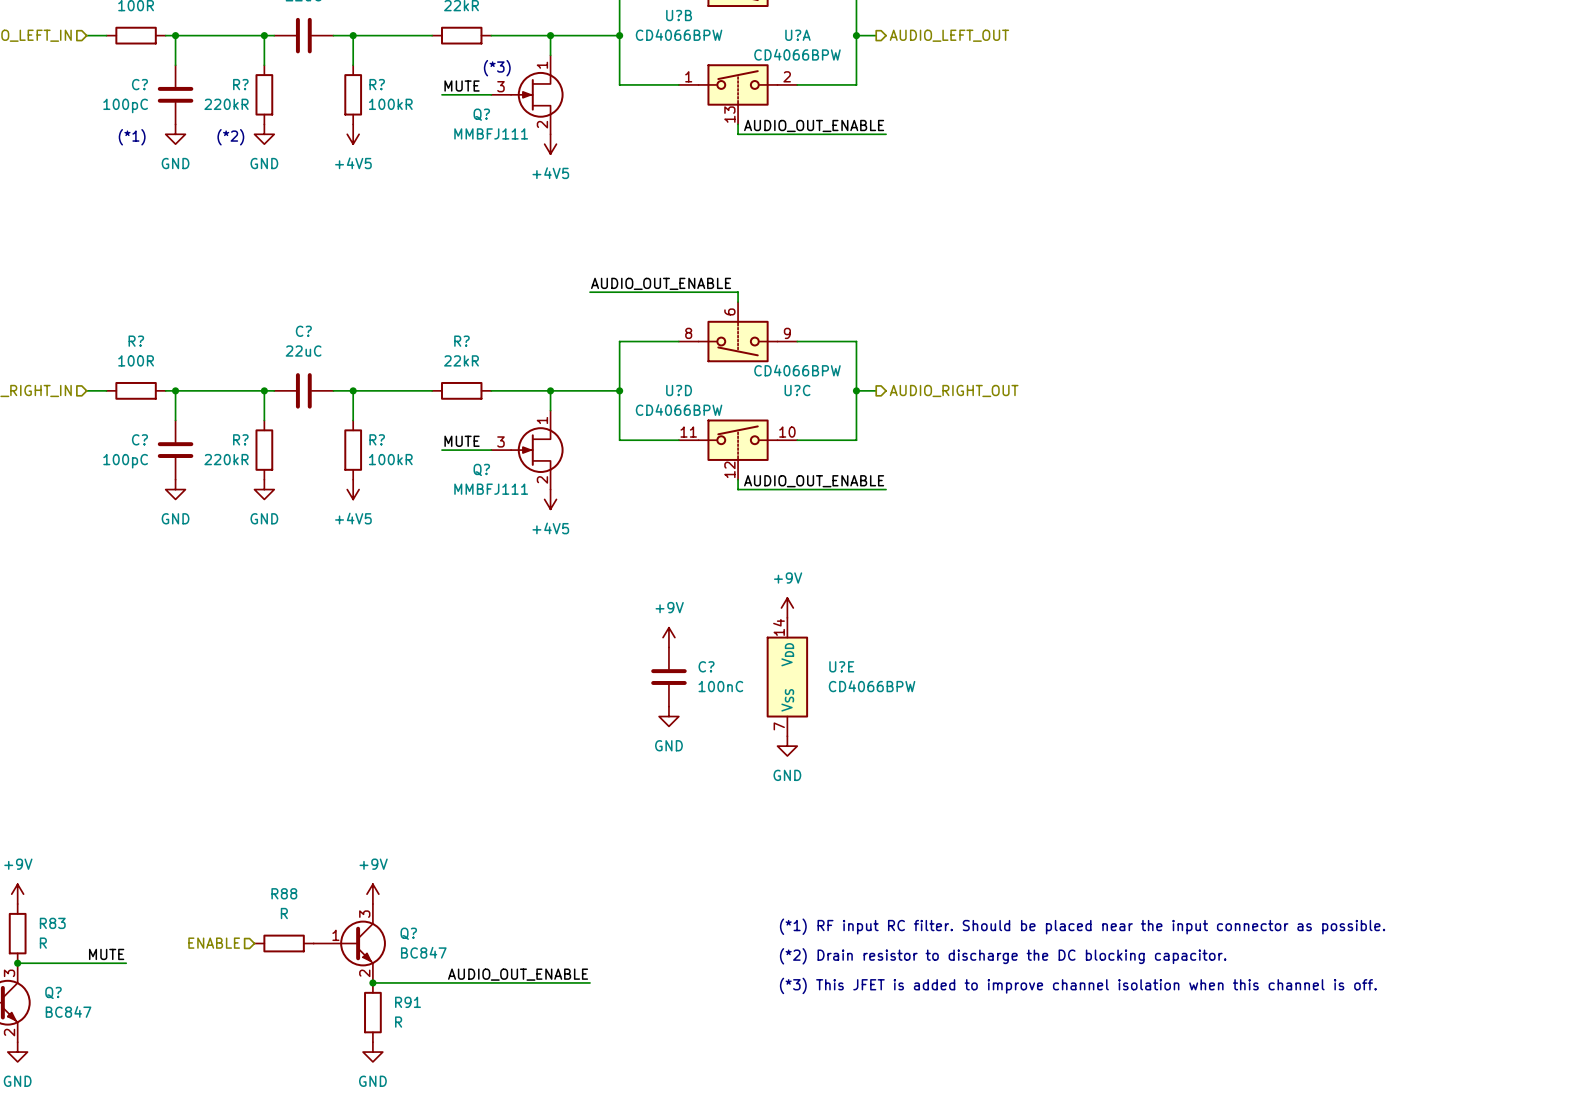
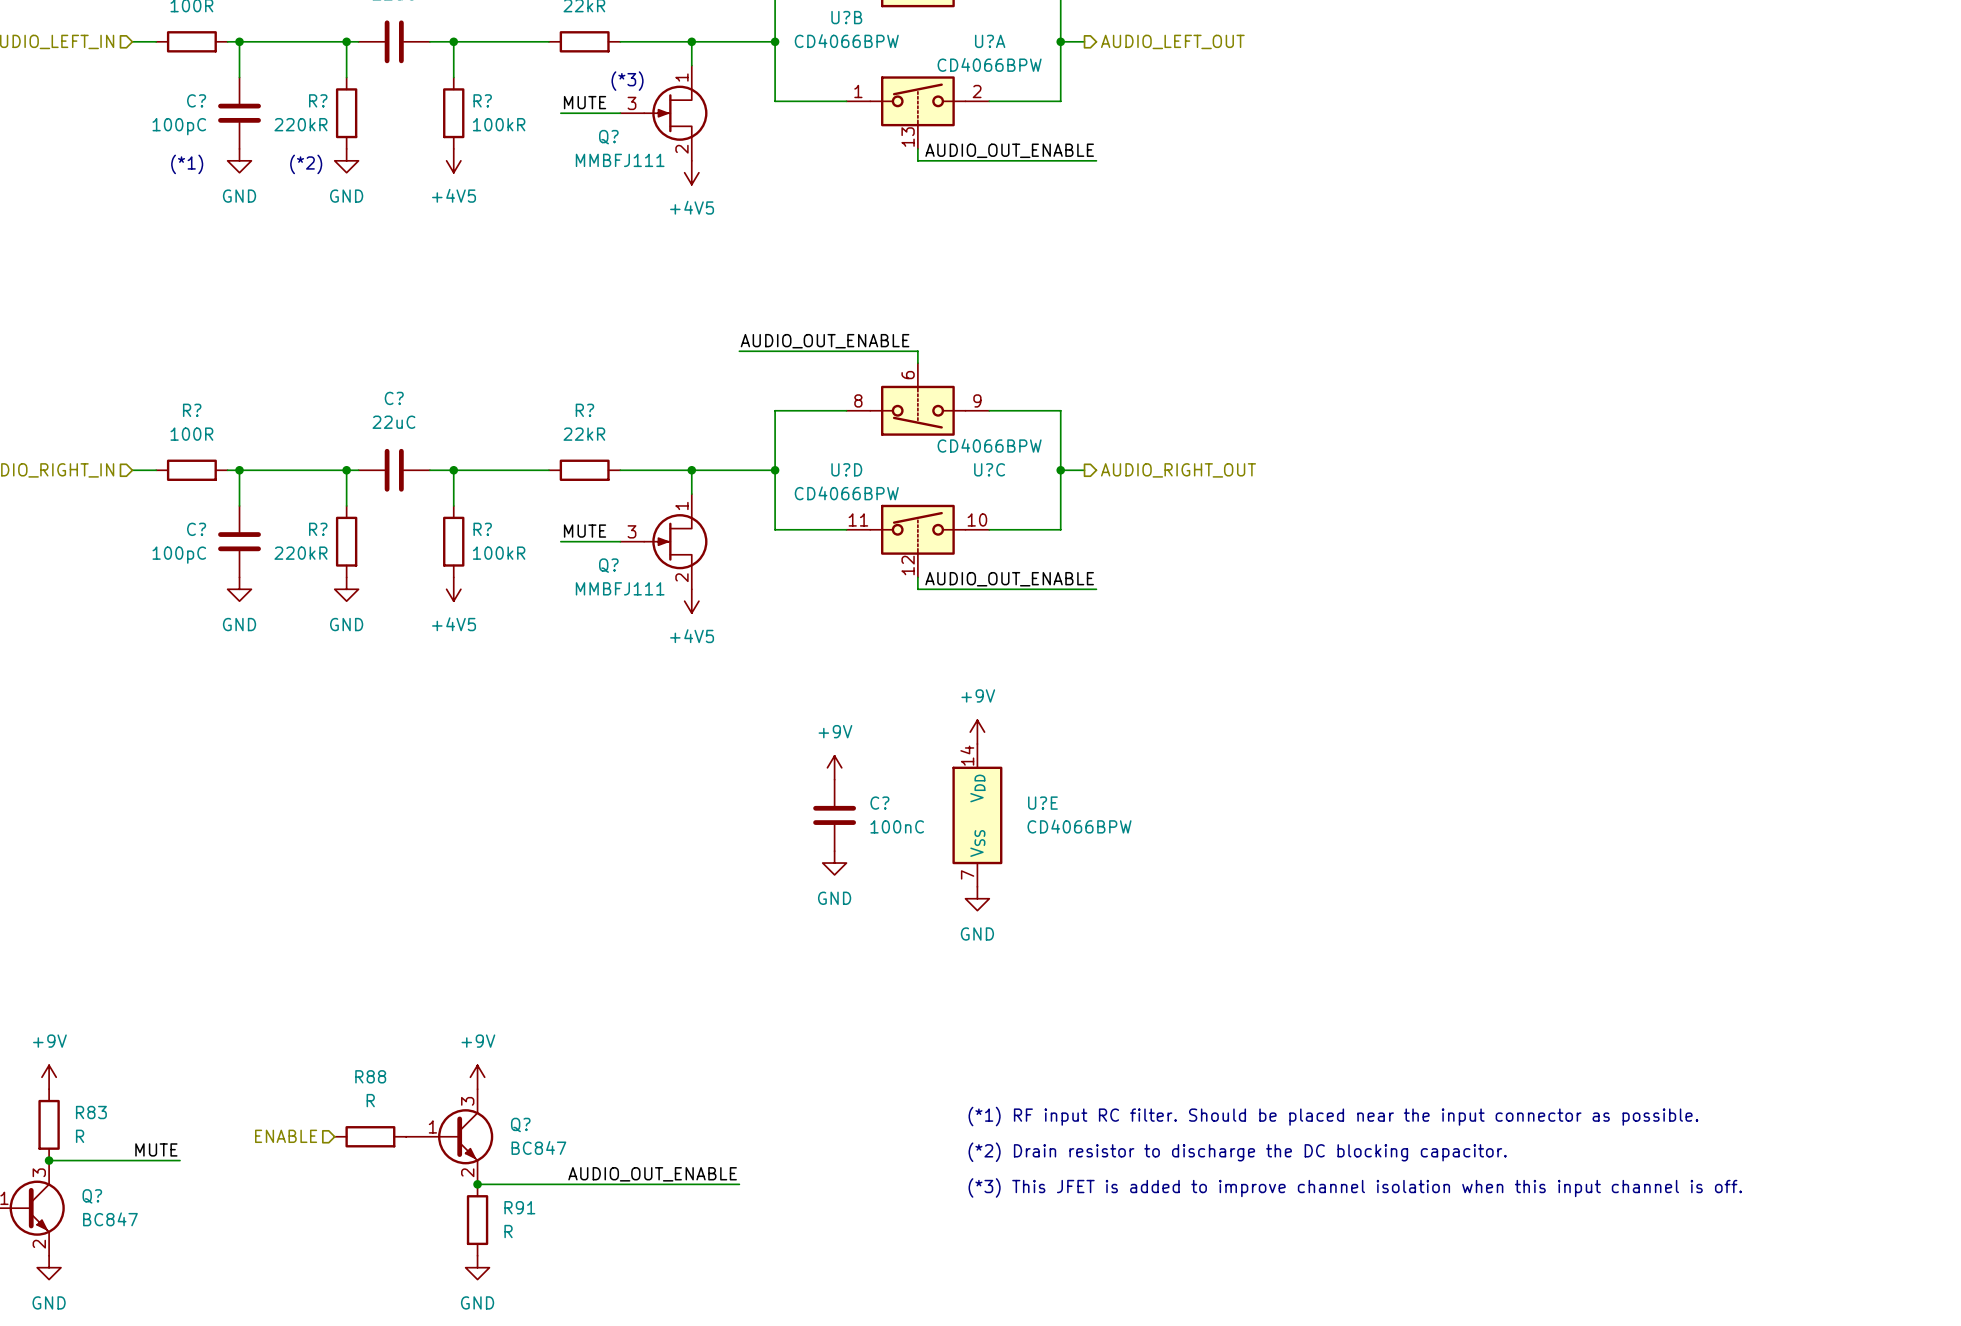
text: (*3) This JFET is added to improve channel isolation when this channel is off. (1078, 985) -> (*3) This JFET is added to improve channel isolation when this input channel is off. (1355, 1187)

